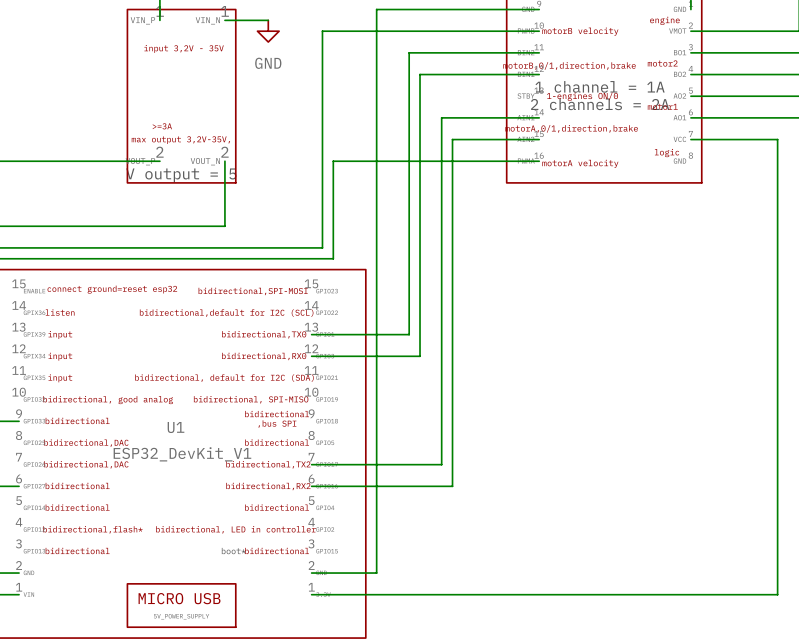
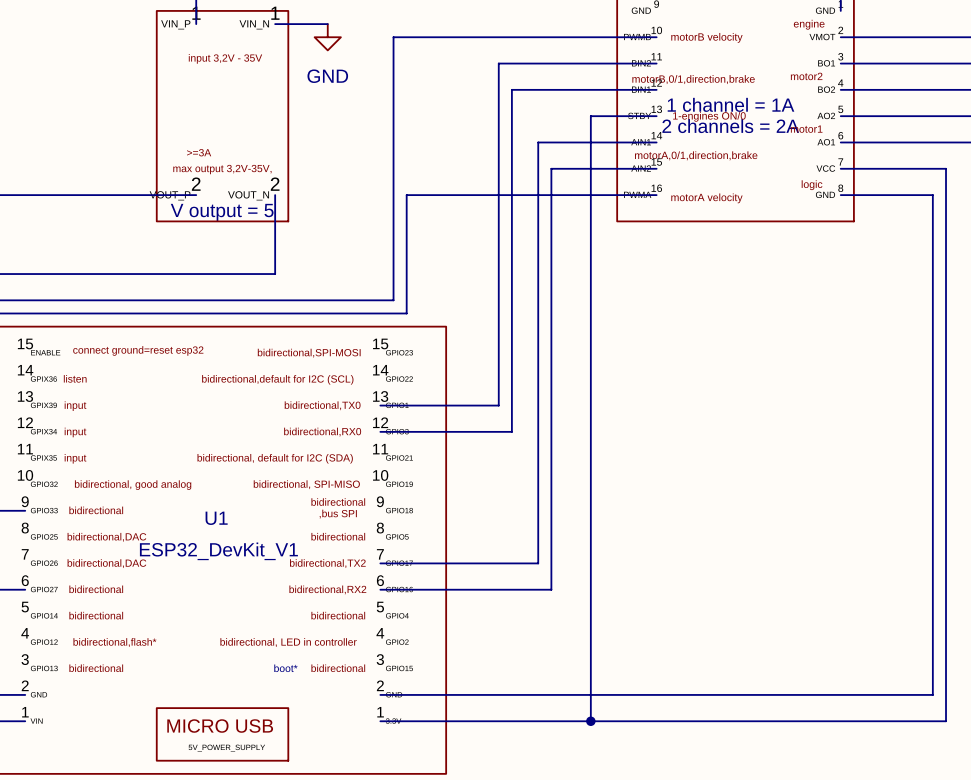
wire: (539, 9) (376, 9) (376, 573) -> (840, 195) (932, 195) (932, 694) (459, 694)
wire: none -> (656, 116) (590, 116) (590, 721)
junction: none -> (590, 721)

